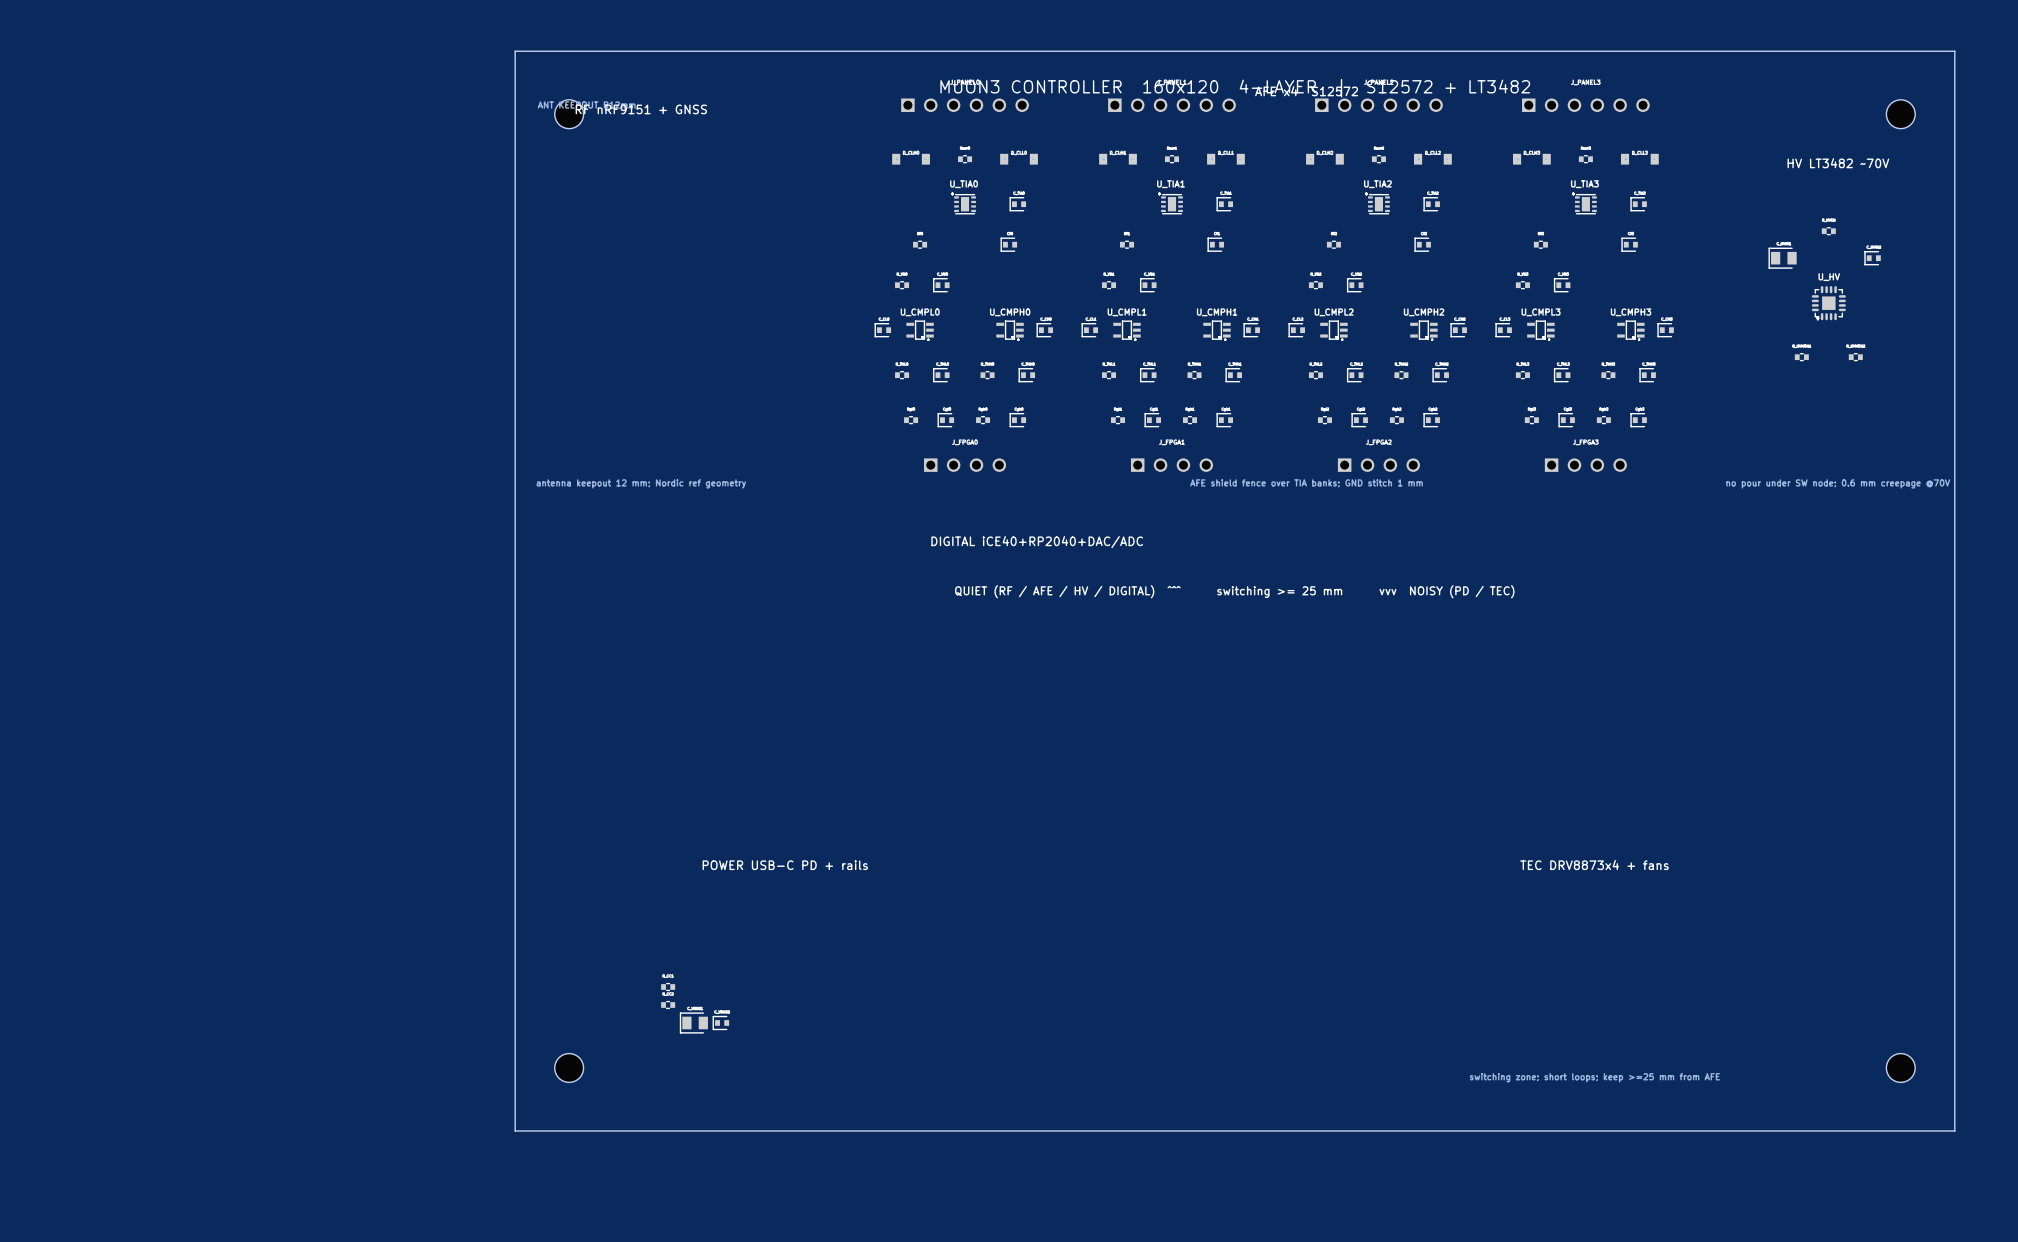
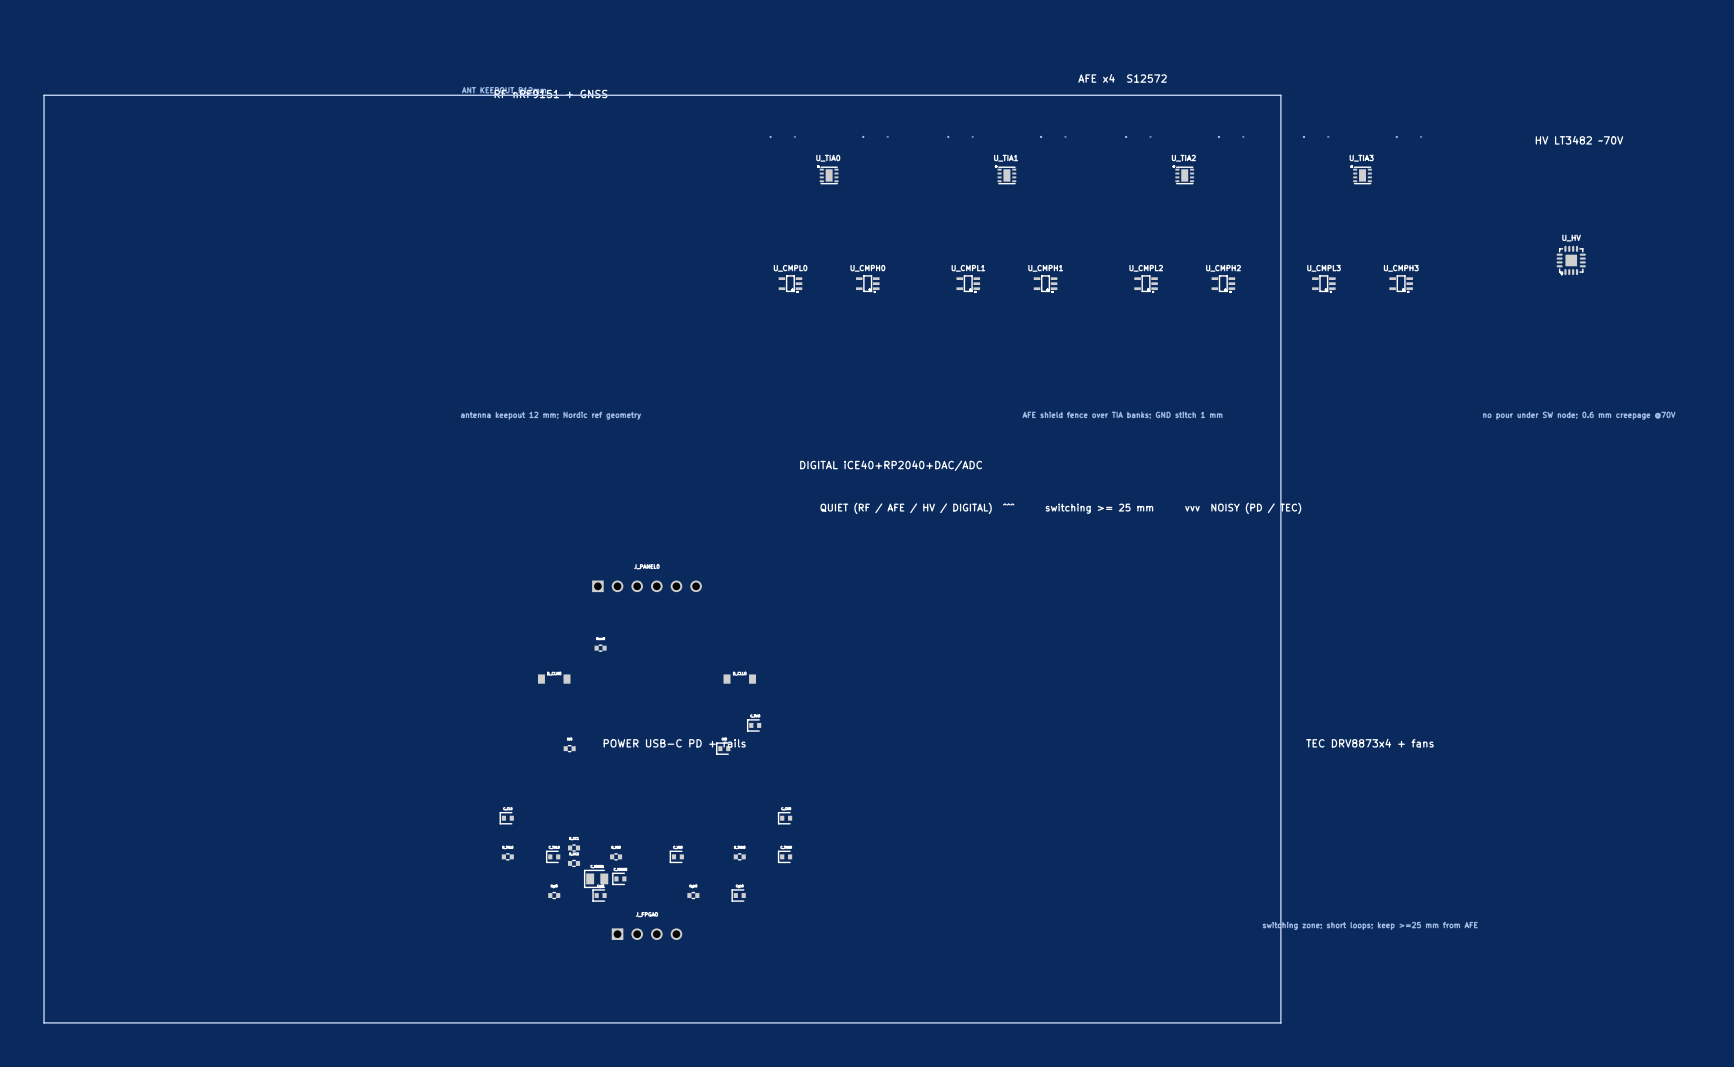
board edge: (515, 51) (1954, 51) (1954, 1130) (515, 1130) (515, 51) -> none
text: MUON3 CONTROLLER 160x120 4-LAYER | S12572 + LT3482 (1235, 88) -> none
part position: (965, 105) -> (646, 586)
part: (1171, 105) -> none
part: (1378, 105) -> none
part: (1585, 105) -> none
board edge: none -> (44, 95) (1280, 95) (1280, 1022) (44, 1022) (44, 95)
part: (569, 114) -> none
part: (1900, 114) -> none
part position: (911, 159) -> (554, 679)
part position: (965, 159) -> (600, 648)
part position: (1019, 159) -> (739, 679)
part: (1118, 159) -> none
part: (1171, 159) -> none
part: (1225, 159) -> none
part: (1324, 159) -> none
part: (1378, 159) -> none
part: (1432, 159) -> none
part: (1531, 159) -> none
part: (1585, 159) -> none
part: (1639, 159) -> none
part position: (1017, 204) -> (754, 725)
part: (1224, 204) -> none
part: (1431, 204) -> none
part: (1638, 204) -> none
part: (1828, 231) -> none
part position: (920, 244) -> (569, 748)
part position: (1008, 244) -> (723, 748)
part: (1127, 244) -> none
part: (1215, 244) -> none
part: (1333, 244) -> none
part: (1422, 244) -> none
part: (1540, 244) -> none
part: (1629, 244) -> none
part: (1782, 258) -> none
part: (1872, 258) -> none
part position: (902, 285) -> (616, 856)
part position: (941, 285) -> (676, 856)
part: (1109, 285) -> none
part: (1148, 285) -> none
part: (1315, 285) -> none
part: (1355, 285) -> none
part: (1522, 285) -> none
part: (1562, 285) -> none
part position: (882, 330) -> (506, 818)
part position: (1044, 330) -> (785, 818)
part: (1089, 330) -> none
part: (1251, 330) -> none
part: (1296, 330) -> none
part: (1458, 330) -> none
part: (1503, 330) -> none
part: (1665, 330) -> none
part: (1801, 357) -> none
part: (1855, 357) -> none
part position: (902, 375) -> (507, 856)
part position: (941, 375) -> (553, 856)
part position: (987, 375) -> (739, 856)
part position: (1026, 375) -> (785, 856)
part: (1109, 375) -> none
part: (1148, 375) -> none
part: (1194, 375) -> none
part: (1233, 375) -> none
part: (1315, 375) -> none
part: (1355, 375) -> none
part: (1401, 375) -> none
part: (1440, 375) -> none
part: (1522, 375) -> none
part: (1562, 375) -> none
part: (1608, 375) -> none
part: (1647, 375) -> none
part position: (911, 420) -> (554, 895)
part position: (945, 420) -> (599, 895)
part position: (983, 420) -> (693, 895)
part position: (1017, 420) -> (738, 895)
part: (1118, 420) -> none
part: (1152, 420) -> none
part: (1189, 420) -> none
part: (1224, 420) -> none
part: (1324, 420) -> none
part: (1359, 420) -> none
part: (1396, 420) -> none
part: (1431, 420) -> none
part: (1531, 420) -> none
part: (1566, 420) -> none
part: (1603, 420) -> none
part: (1638, 420) -> none
part position: (965, 465) -> (646, 934)
part: (1171, 465) -> none
part: (1378, 465) -> none
part: (1585, 465) -> none
part: (569, 1067) -> none
part: (1900, 1067) -> none

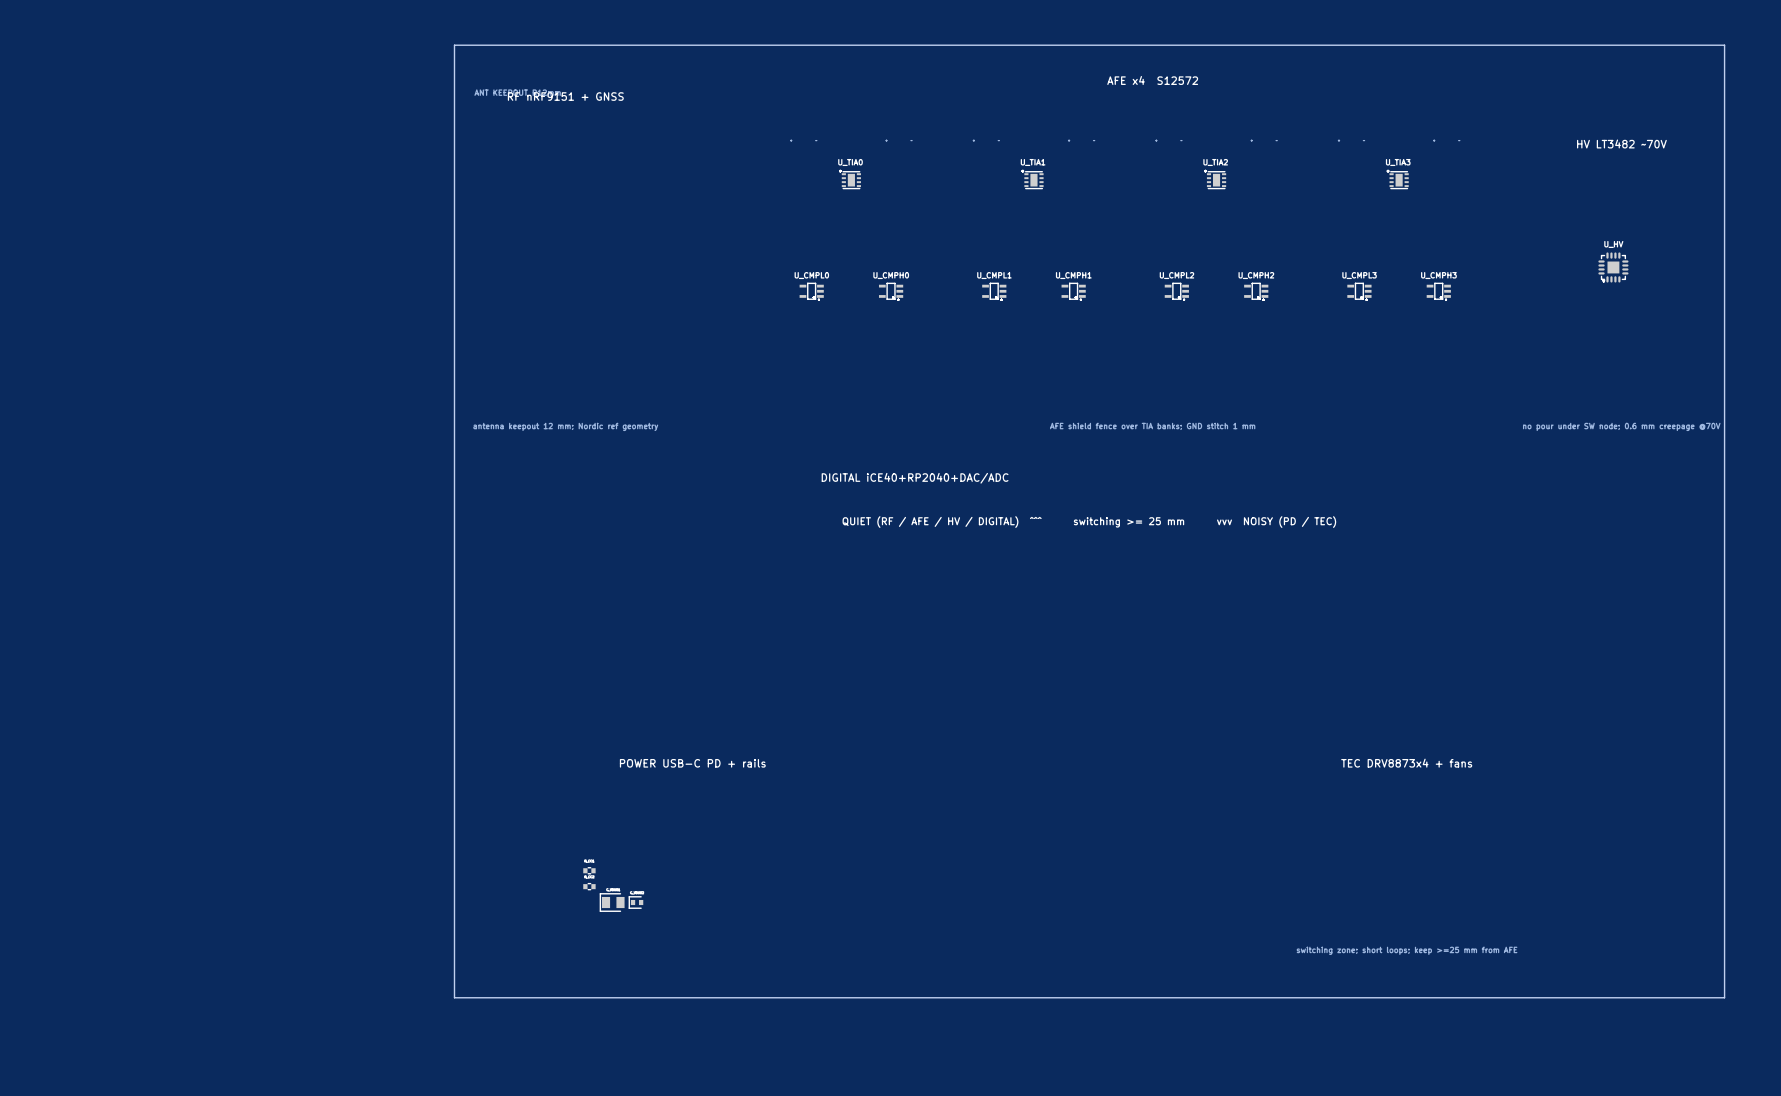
board edge: none -> (454, 45) (1724, 45) (1724, 997) (454, 997) (454, 45)
board edge: (44, 95) (1280, 95) (1280, 1022) (44, 1022) (44, 95) -> none
part: (646, 586) -> none
part: (600, 648) -> none
part: (554, 679) -> none
part: (739, 679) -> none
part: (754, 725) -> none
part: (569, 748) -> none
part: (723, 748) -> none
part: (506, 818) -> none
part: (785, 818) -> none
part: (507, 856) -> none
part: (553, 856) -> none
part: (616, 856) -> none
part: (676, 856) -> none
part: (739, 856) -> none
part: (785, 856) -> none
part: (554, 895) -> none
part: (599, 895) -> none
part: (693, 895) -> none
part: (738, 895) -> none
part: (646, 934) -> none

